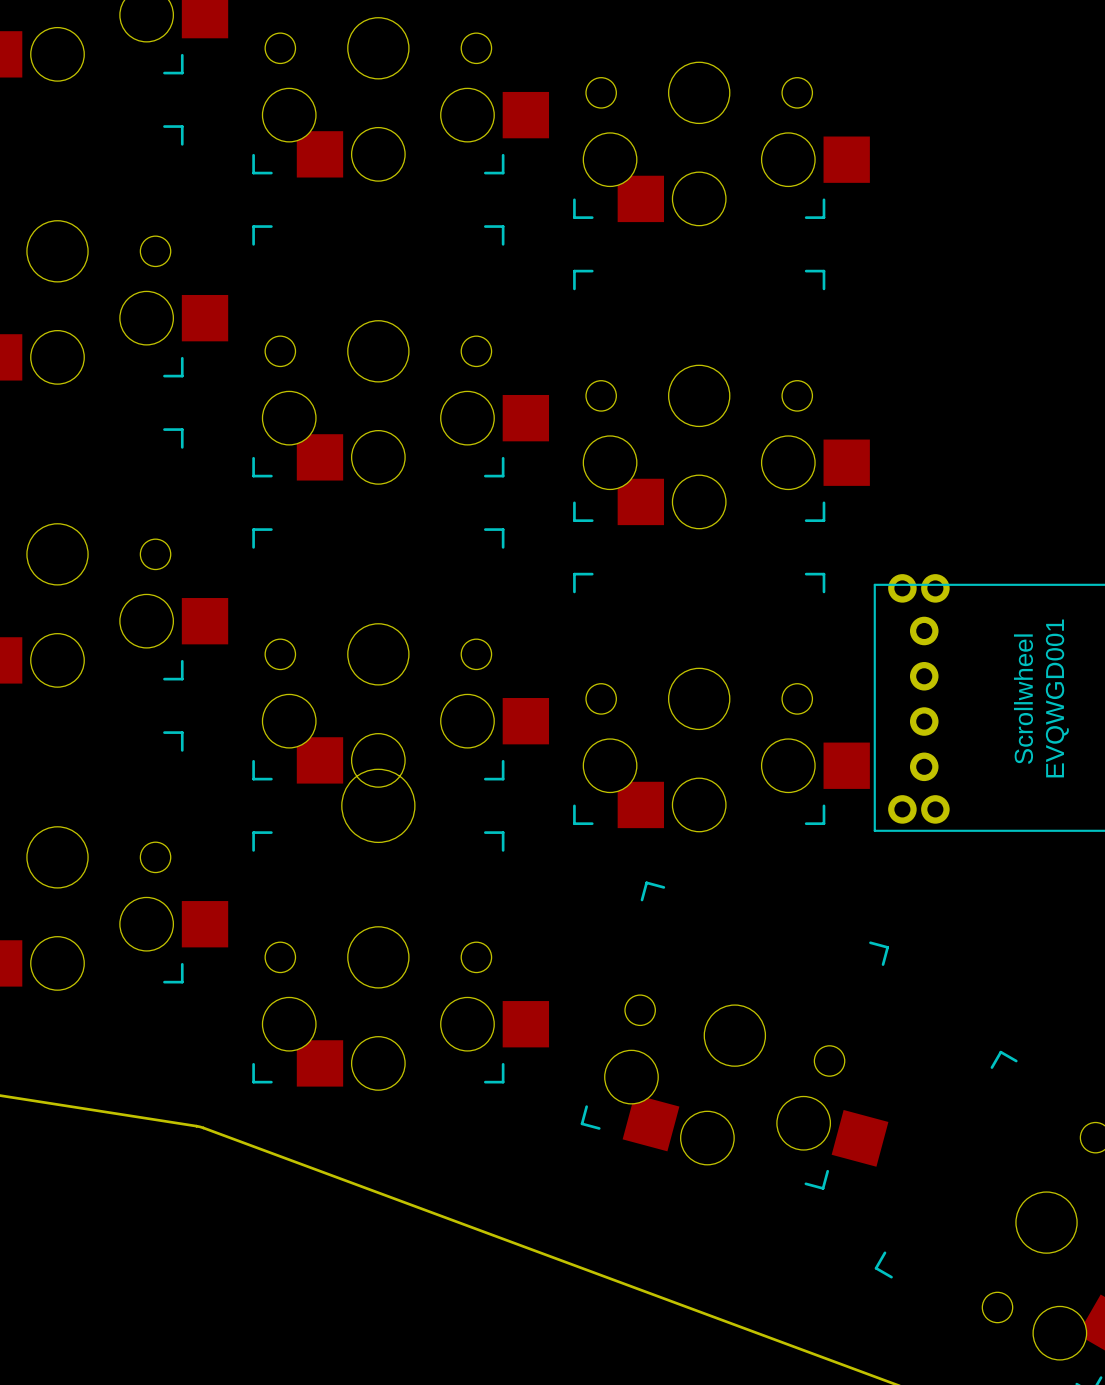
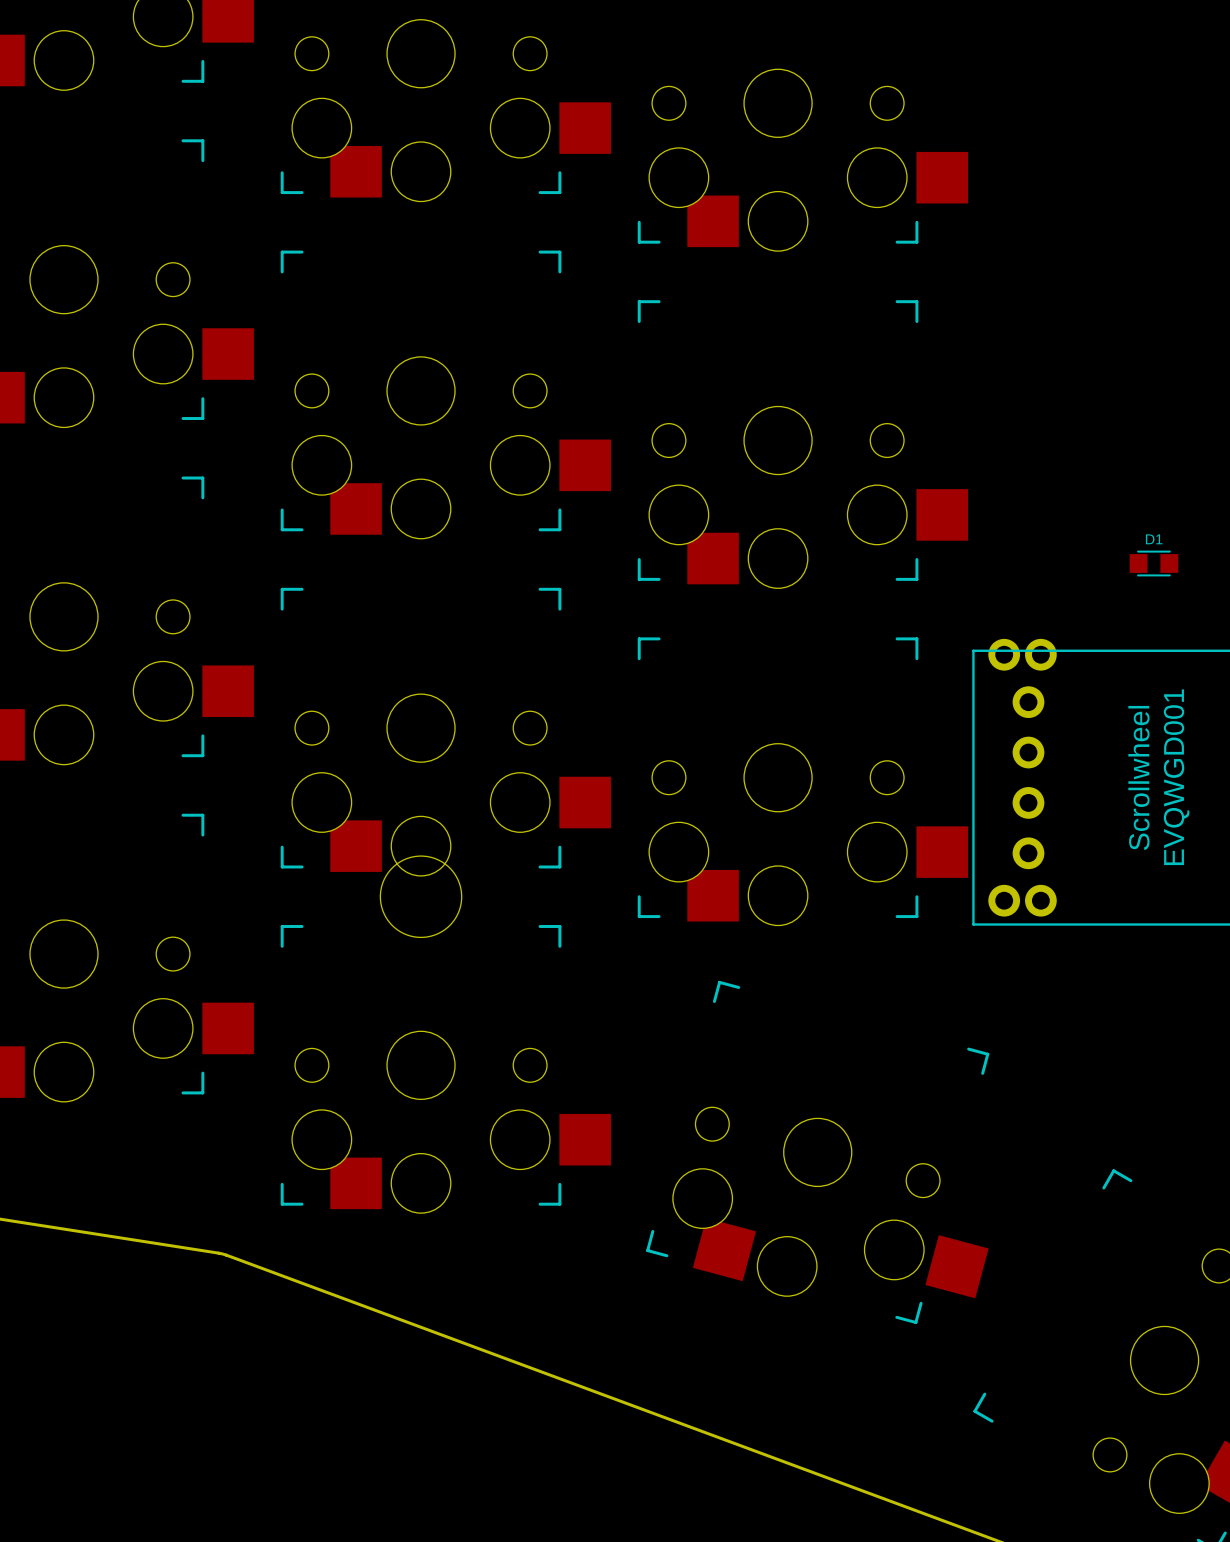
part: none -> (1153, 563)

